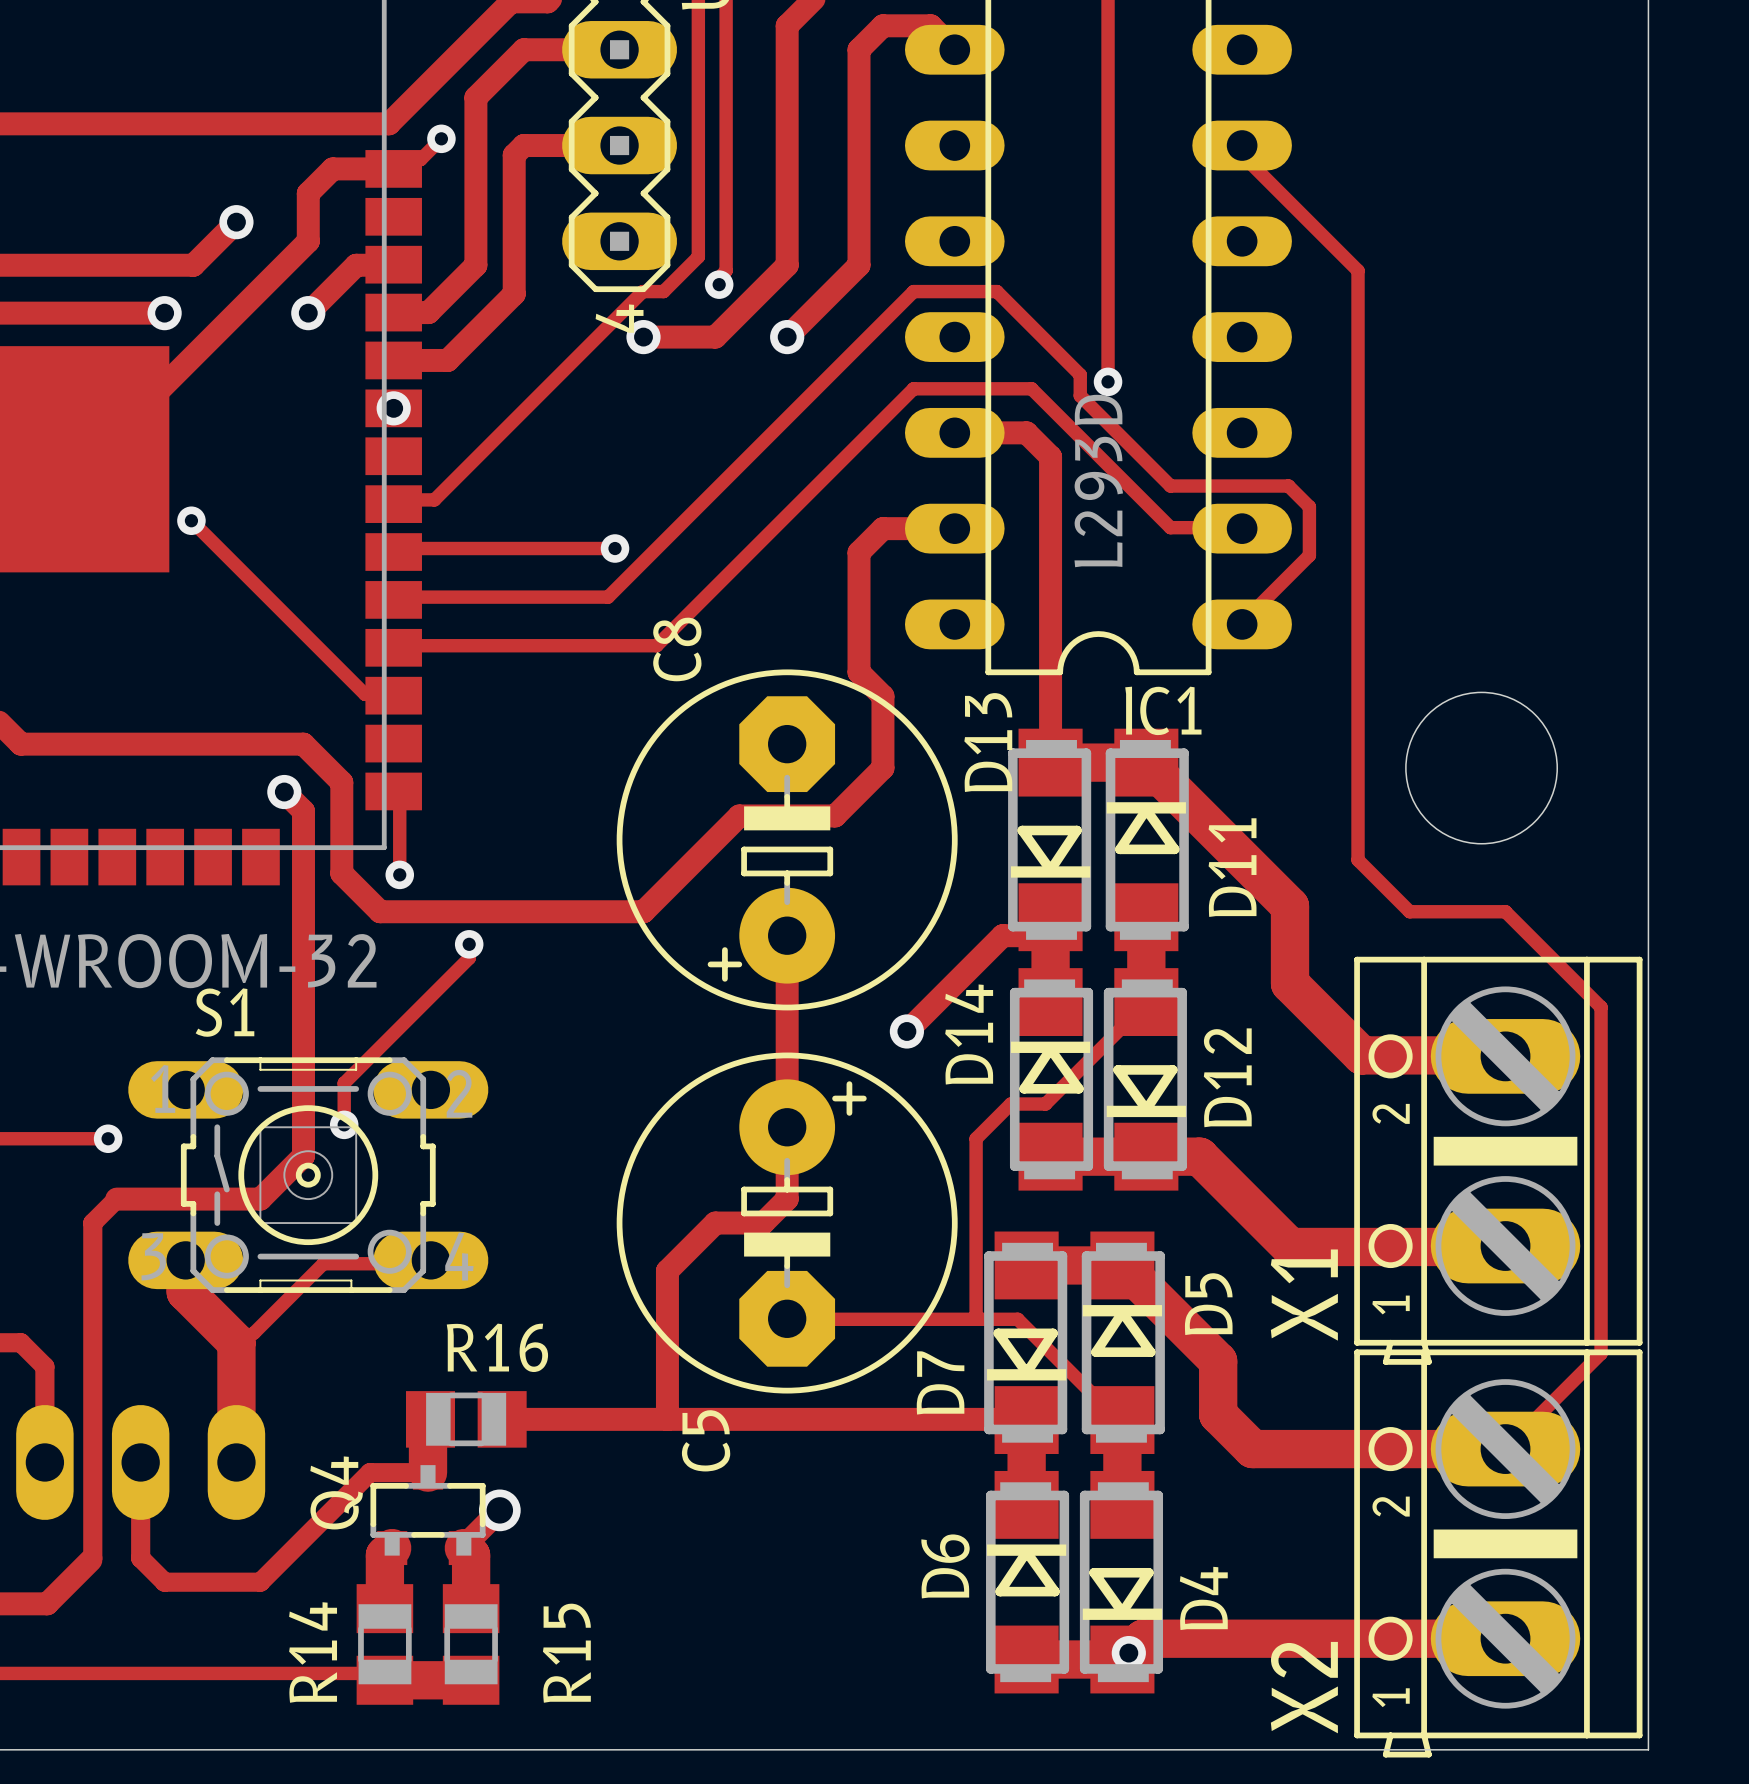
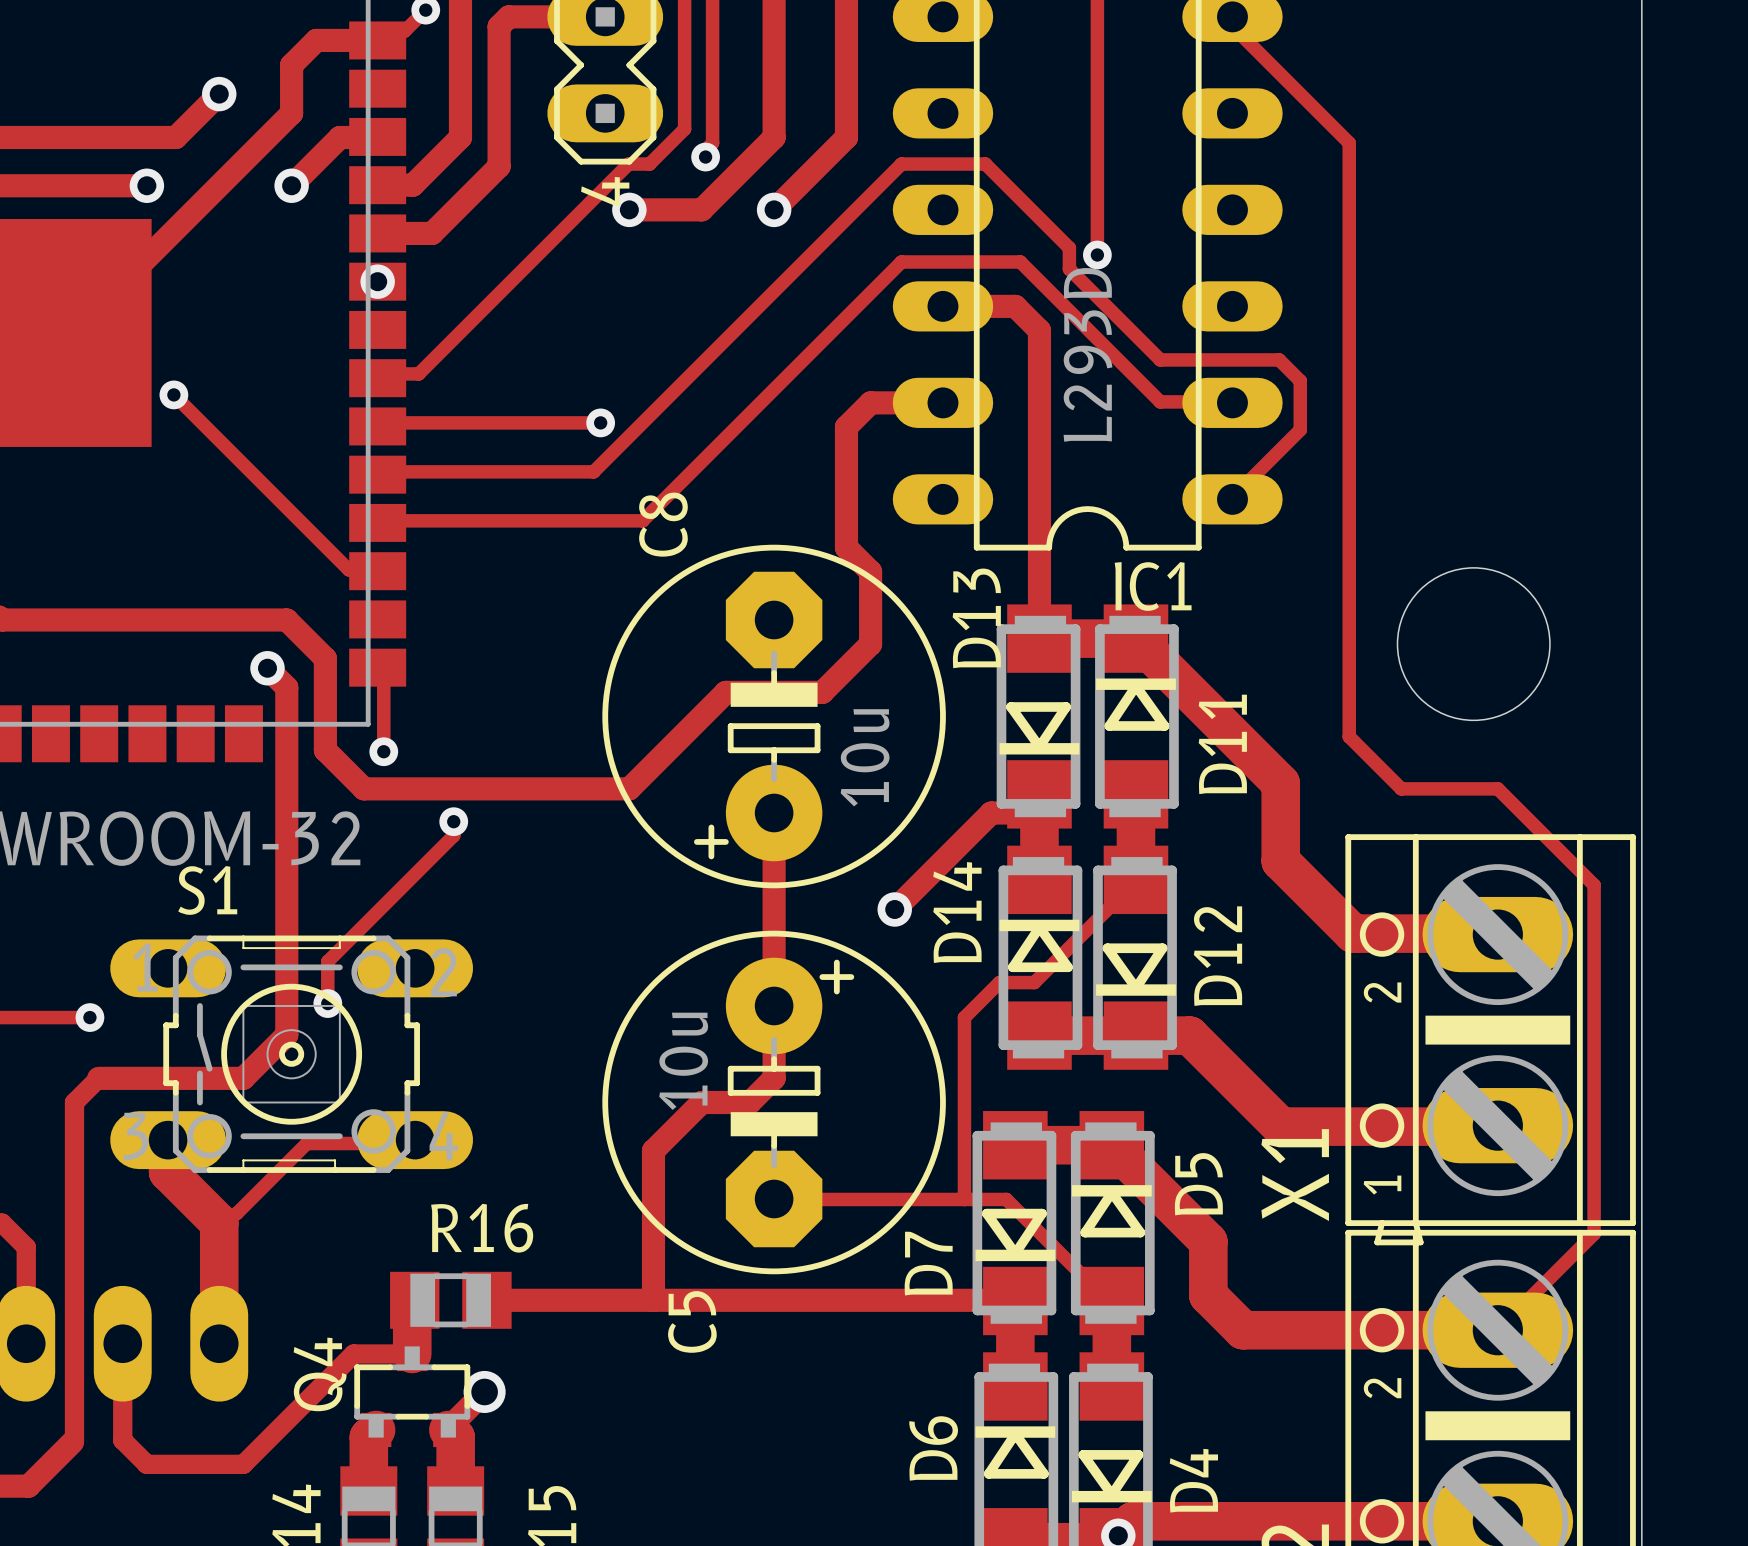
C8 value: none -> 10u (865, 757)
C5 value: none -> 10u (683, 1061)

